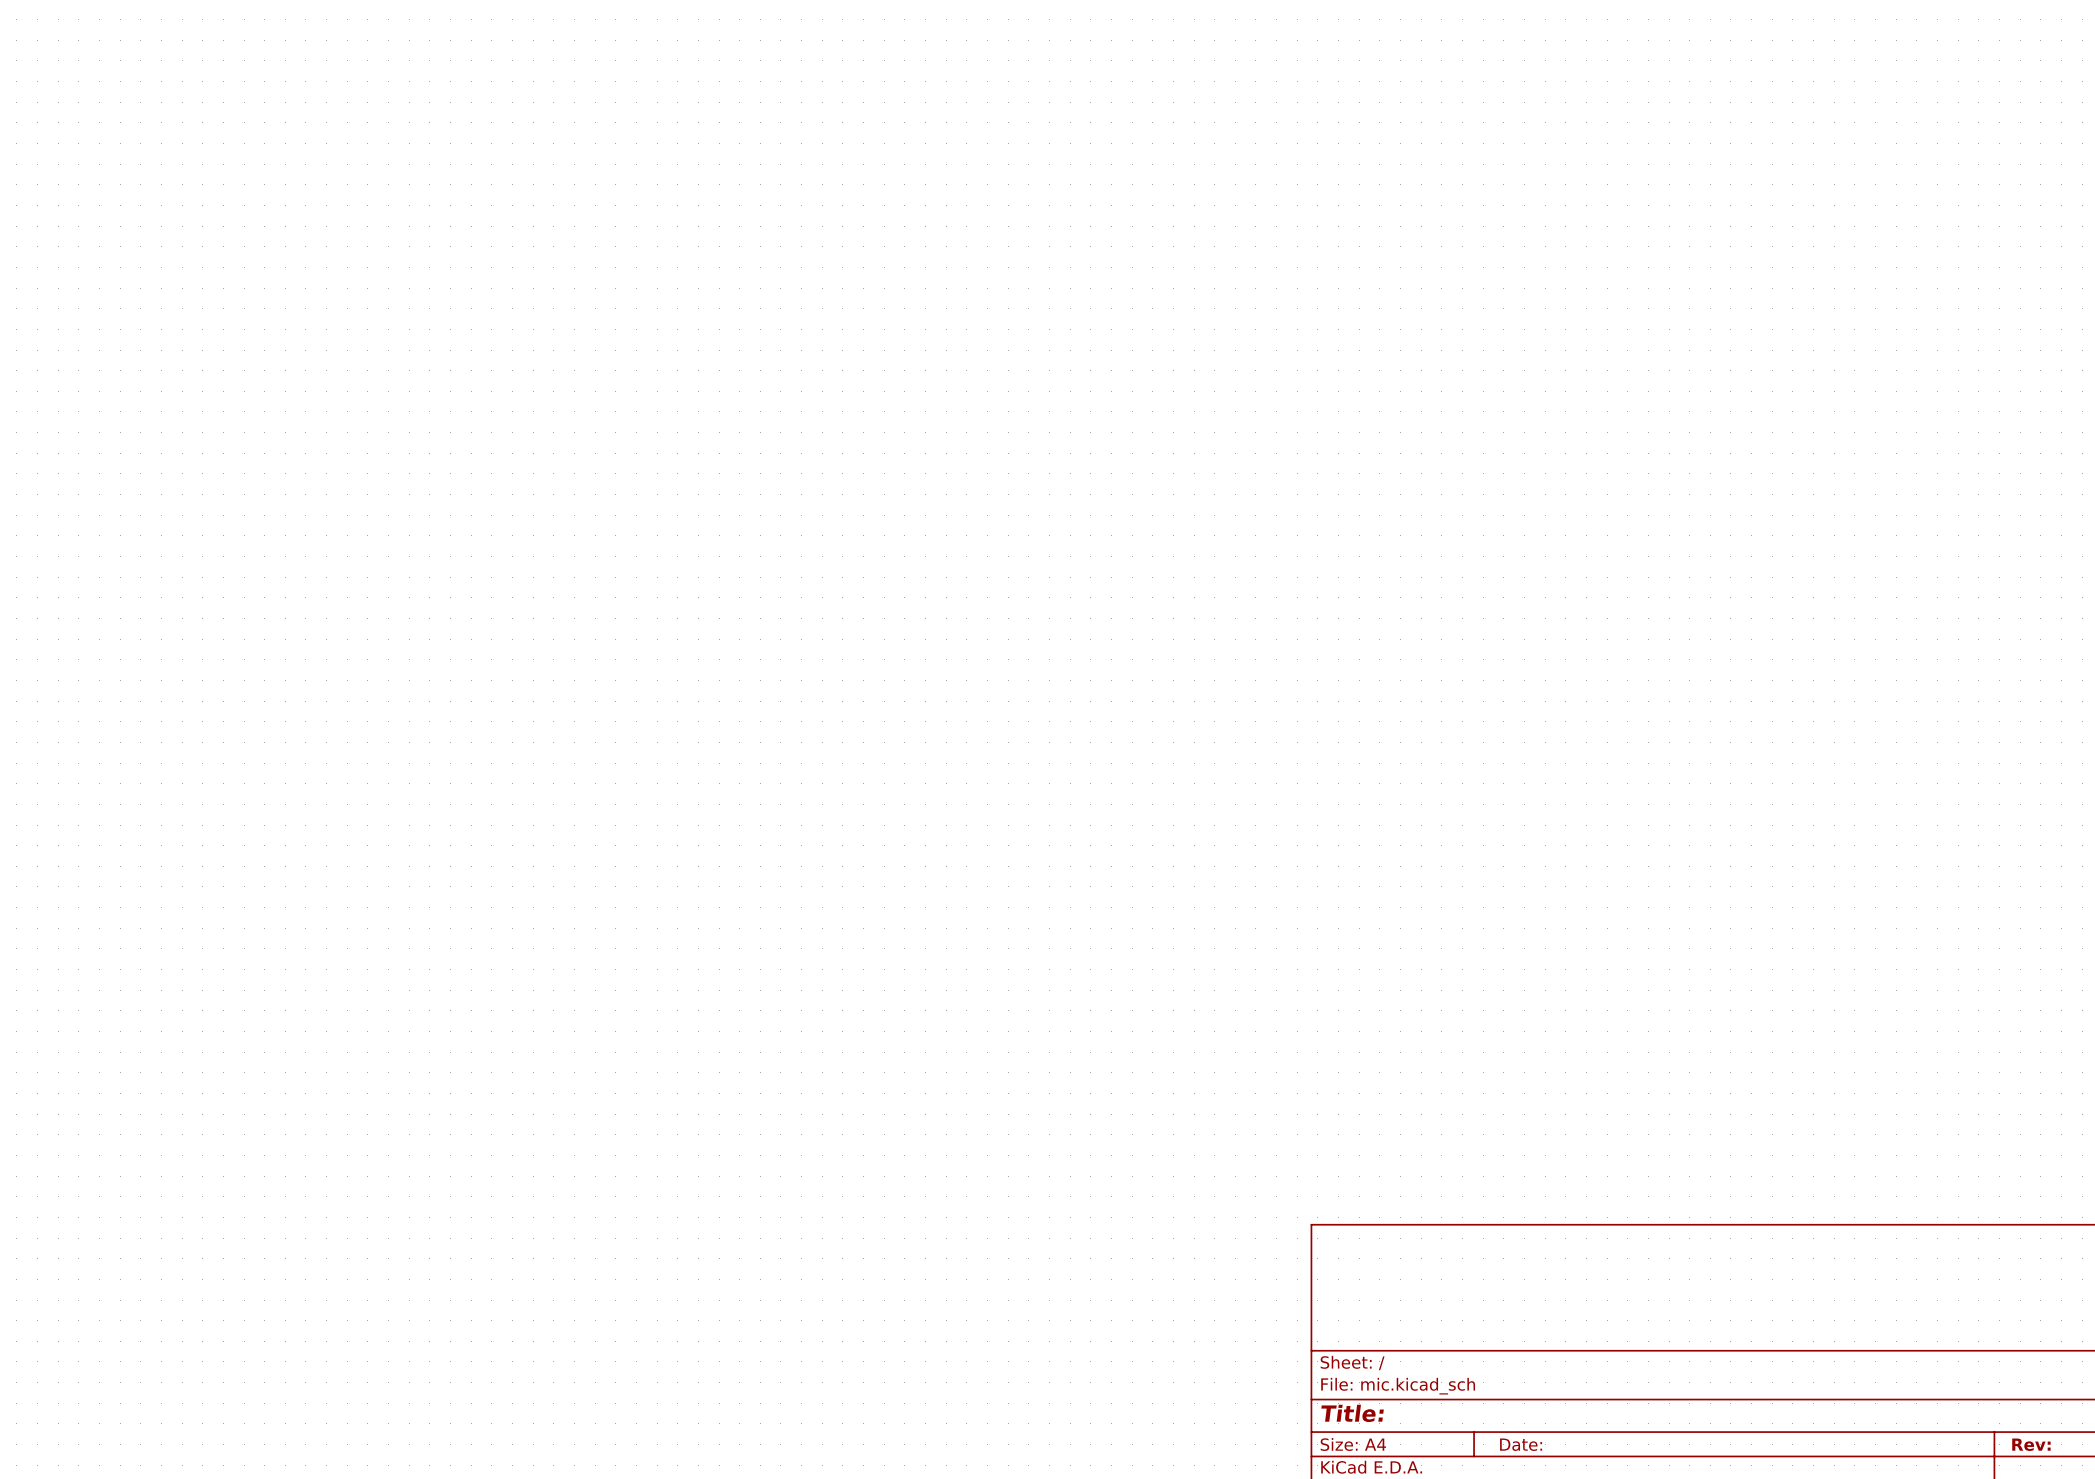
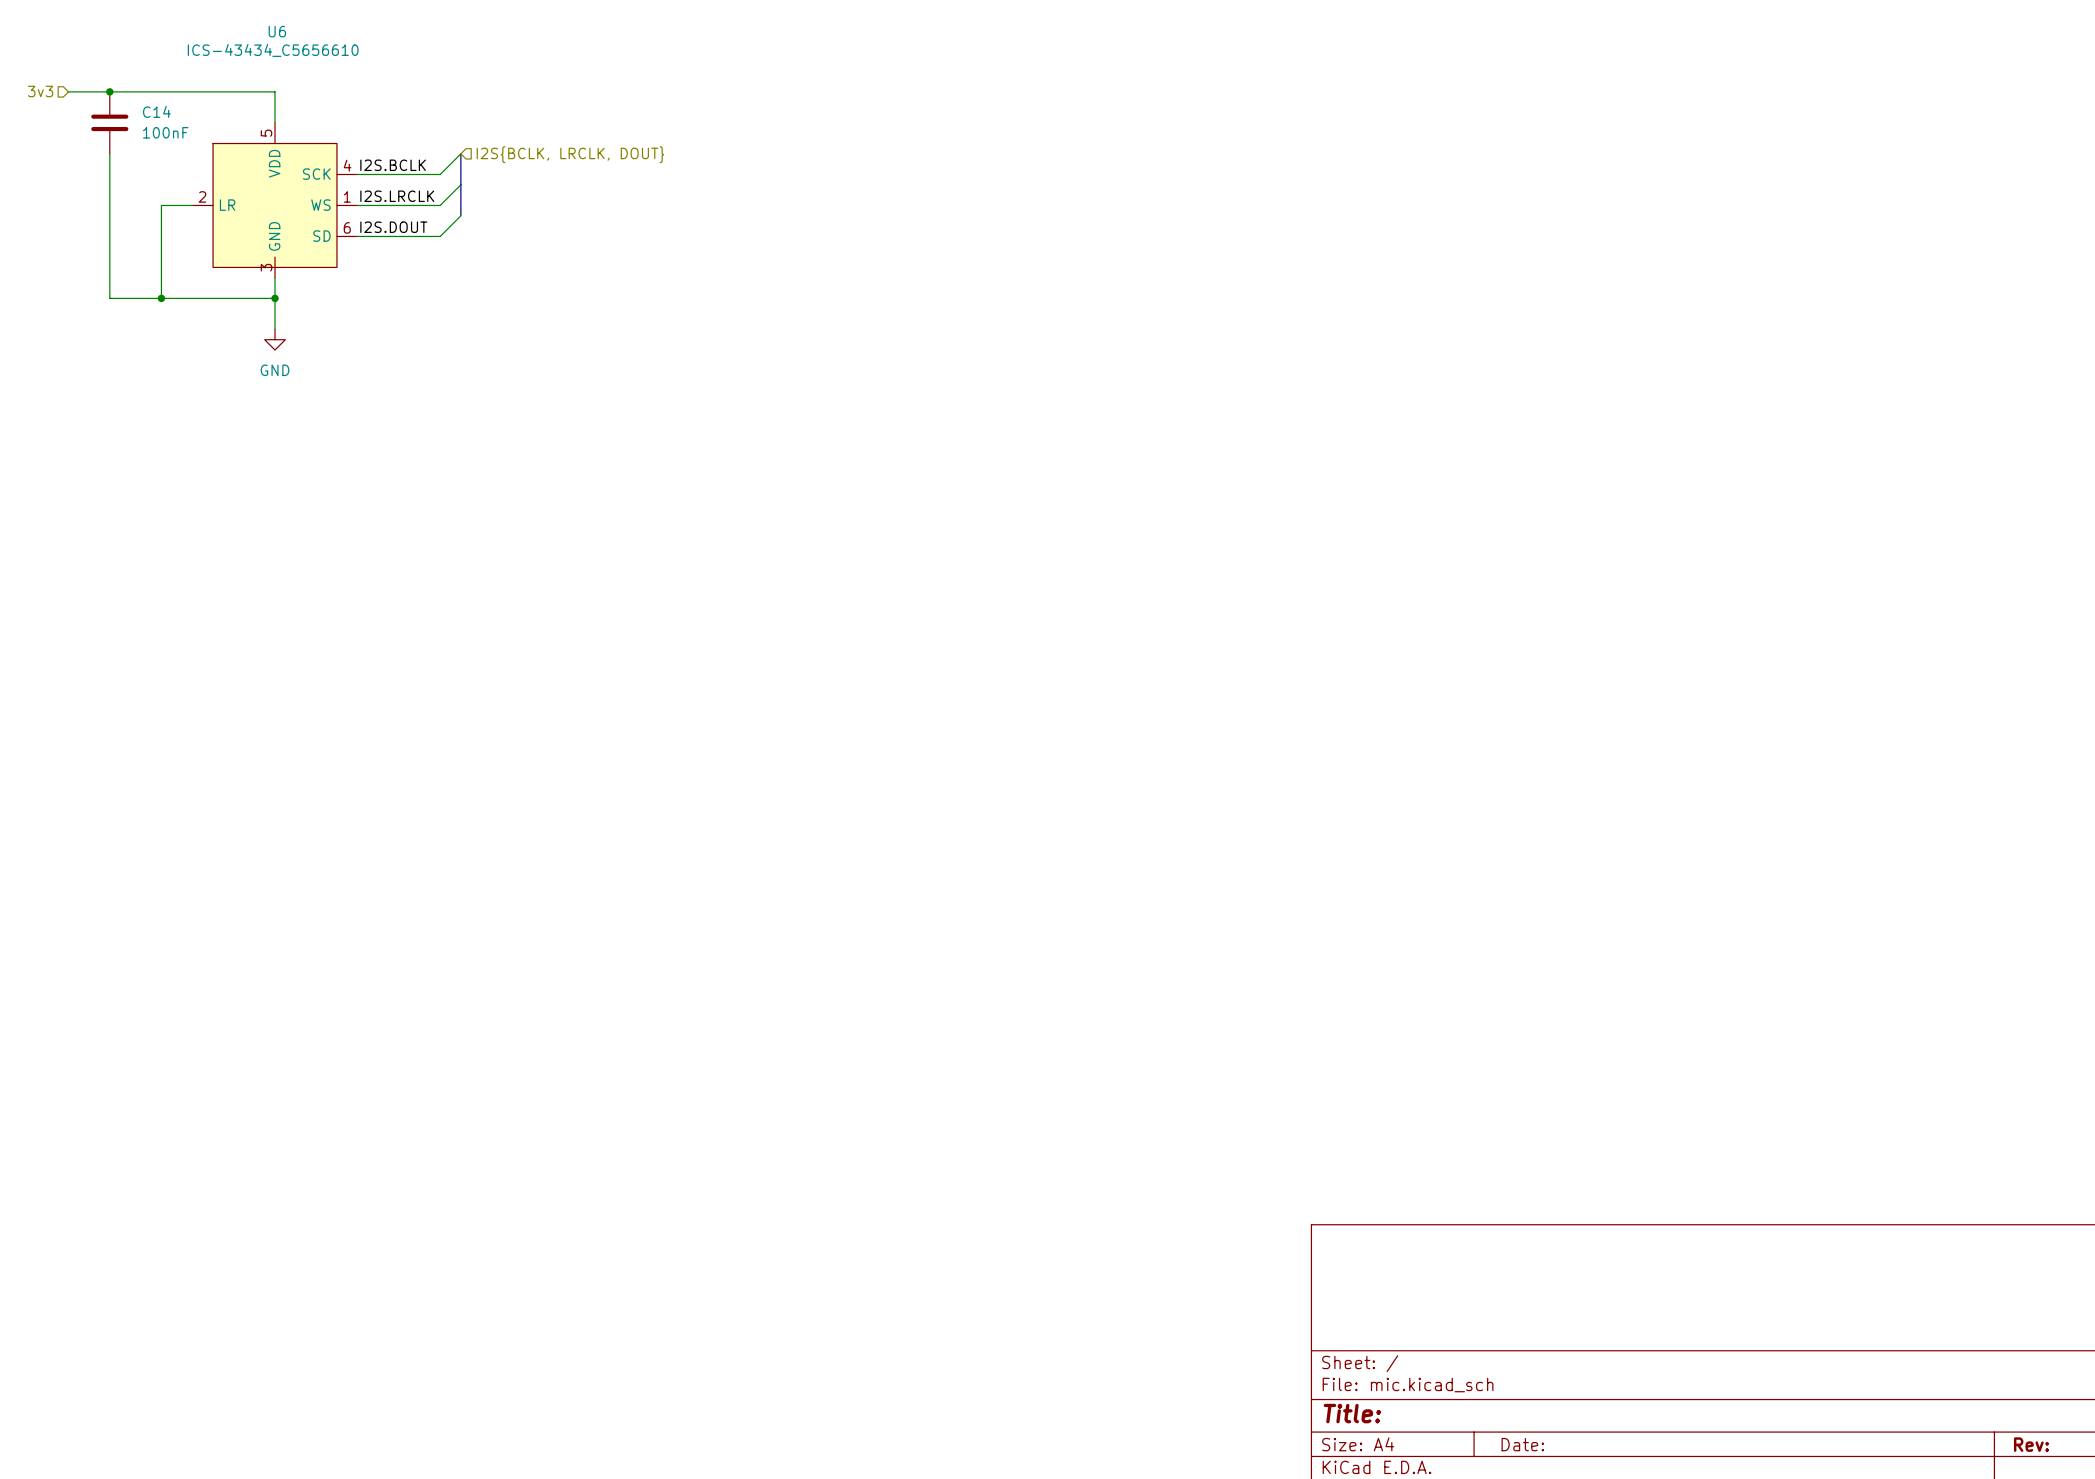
hierarchical label: none -> 3v3 (40, 91)
wire: none -> (68, 91) (275, 91) (275, 122)
junction: none -> (109, 91)
C14: none -> 100nF (109, 122)
wire: none -> (109, 153) (109, 298) (275, 298)
wire: none -> (460, 153) (440, 174) (357, 174)
bus: none -> (460, 153) (460, 215)
hierarchical label: none -> I2S{BCLK, LRCLK, DOUT} (570, 154)
label: none -> I2S.BCLK (393, 165)
wire: none -> (460, 184) (440, 205) (357, 205)
label: none -> I2S.LRCLK (397, 196)
U6: none -> ICS-43434_C5656610 (275, 200)
wire: none -> (192, 205) (161, 205) (161, 298)
wire: none -> (460, 215) (440, 236) (357, 236)
label: none -> I2S.DOUT (393, 227)
wire: none -> (275, 277) (275, 329)
junction: none -> (161, 298)
junction: none -> (275, 298)
power symbol: none -> GND (275, 339)

